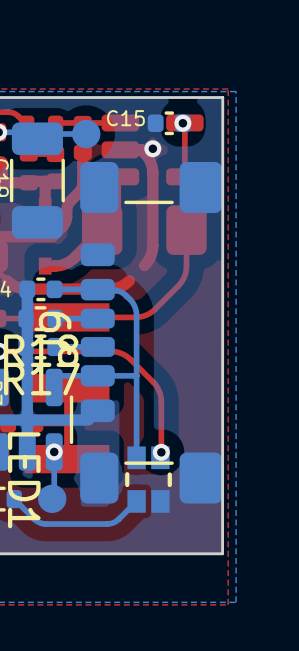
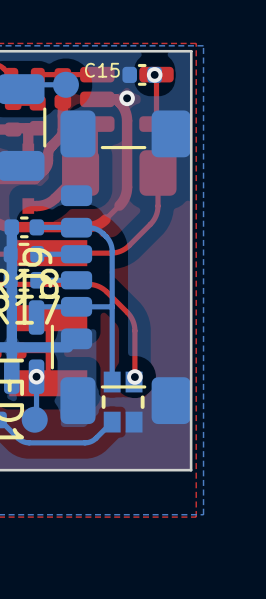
top track: none -> (119, 205) (105, 219)

